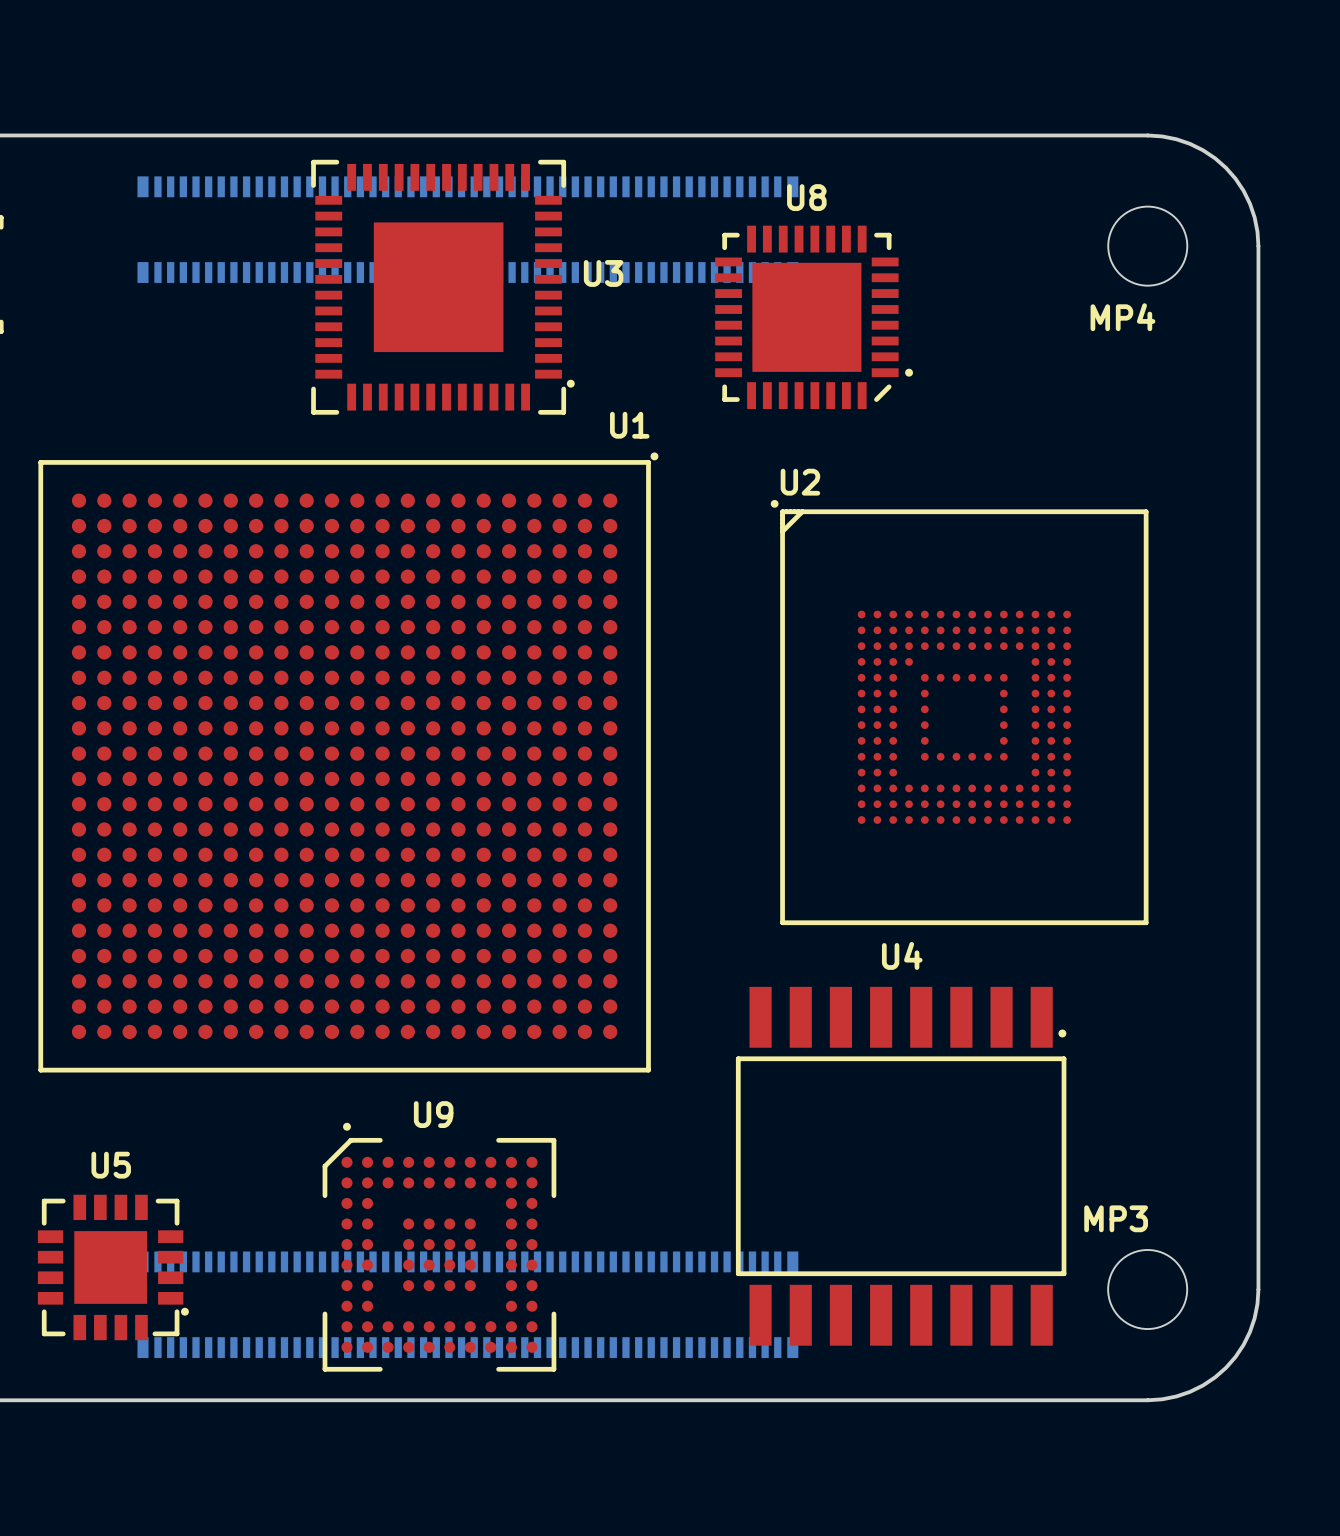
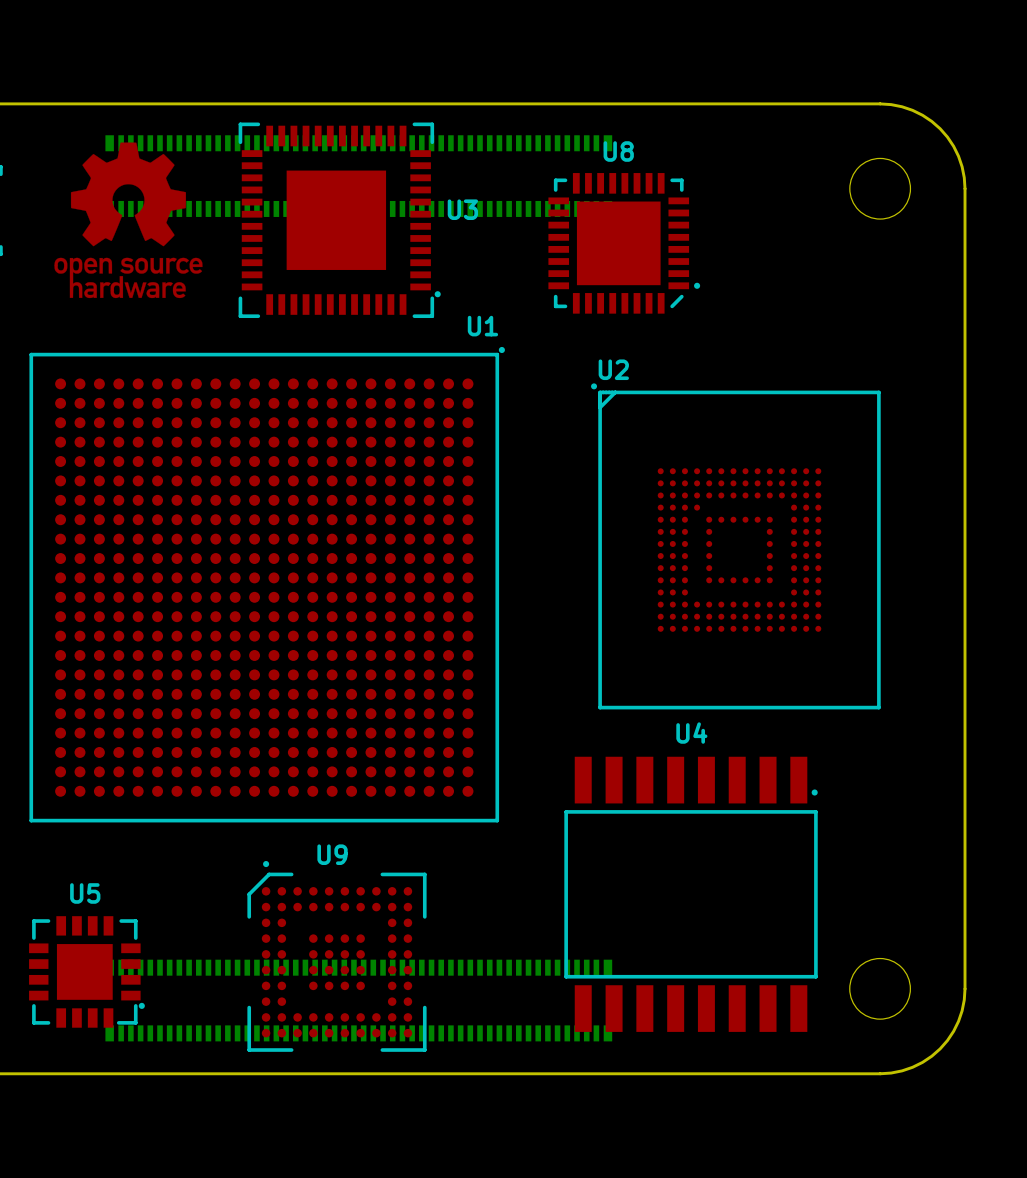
drawing: none -> [54, 142, 203, 299]
MP4 name: MP4 (1122, 317) -> none
MP3 name: MP3 (1116, 1218) -> none

